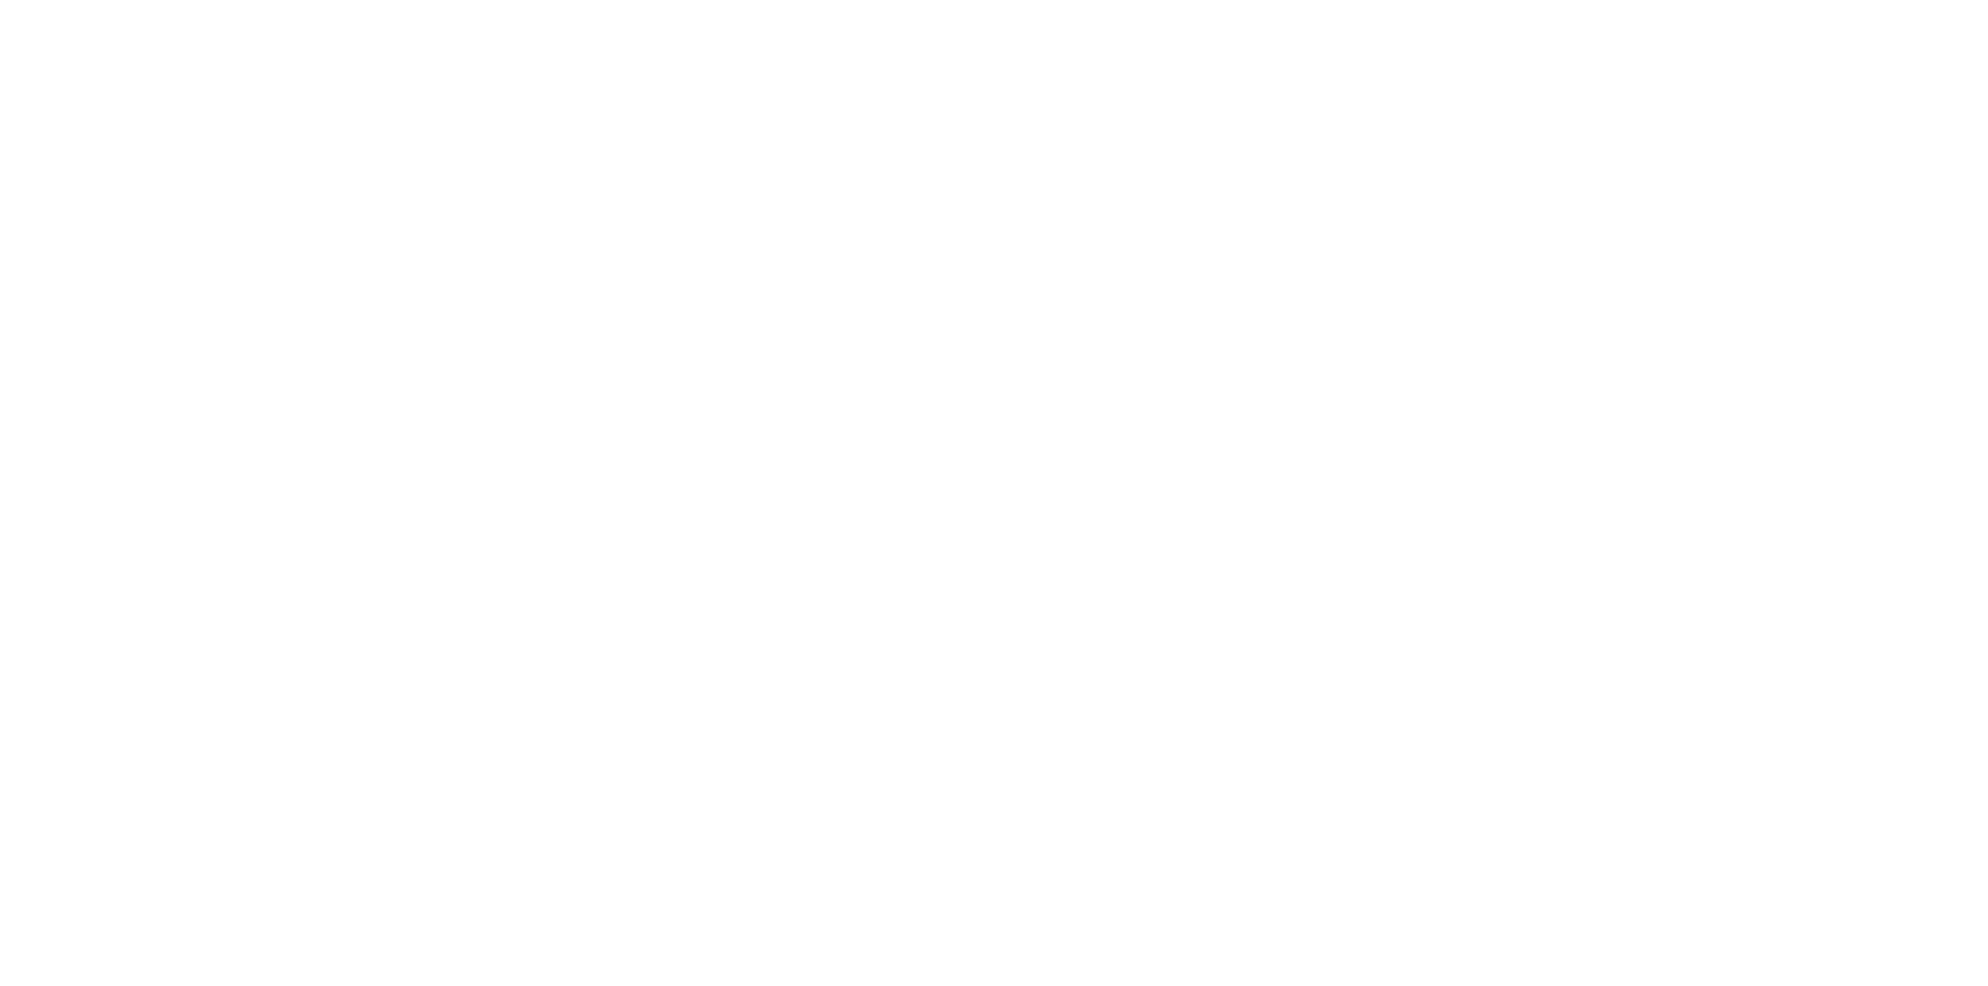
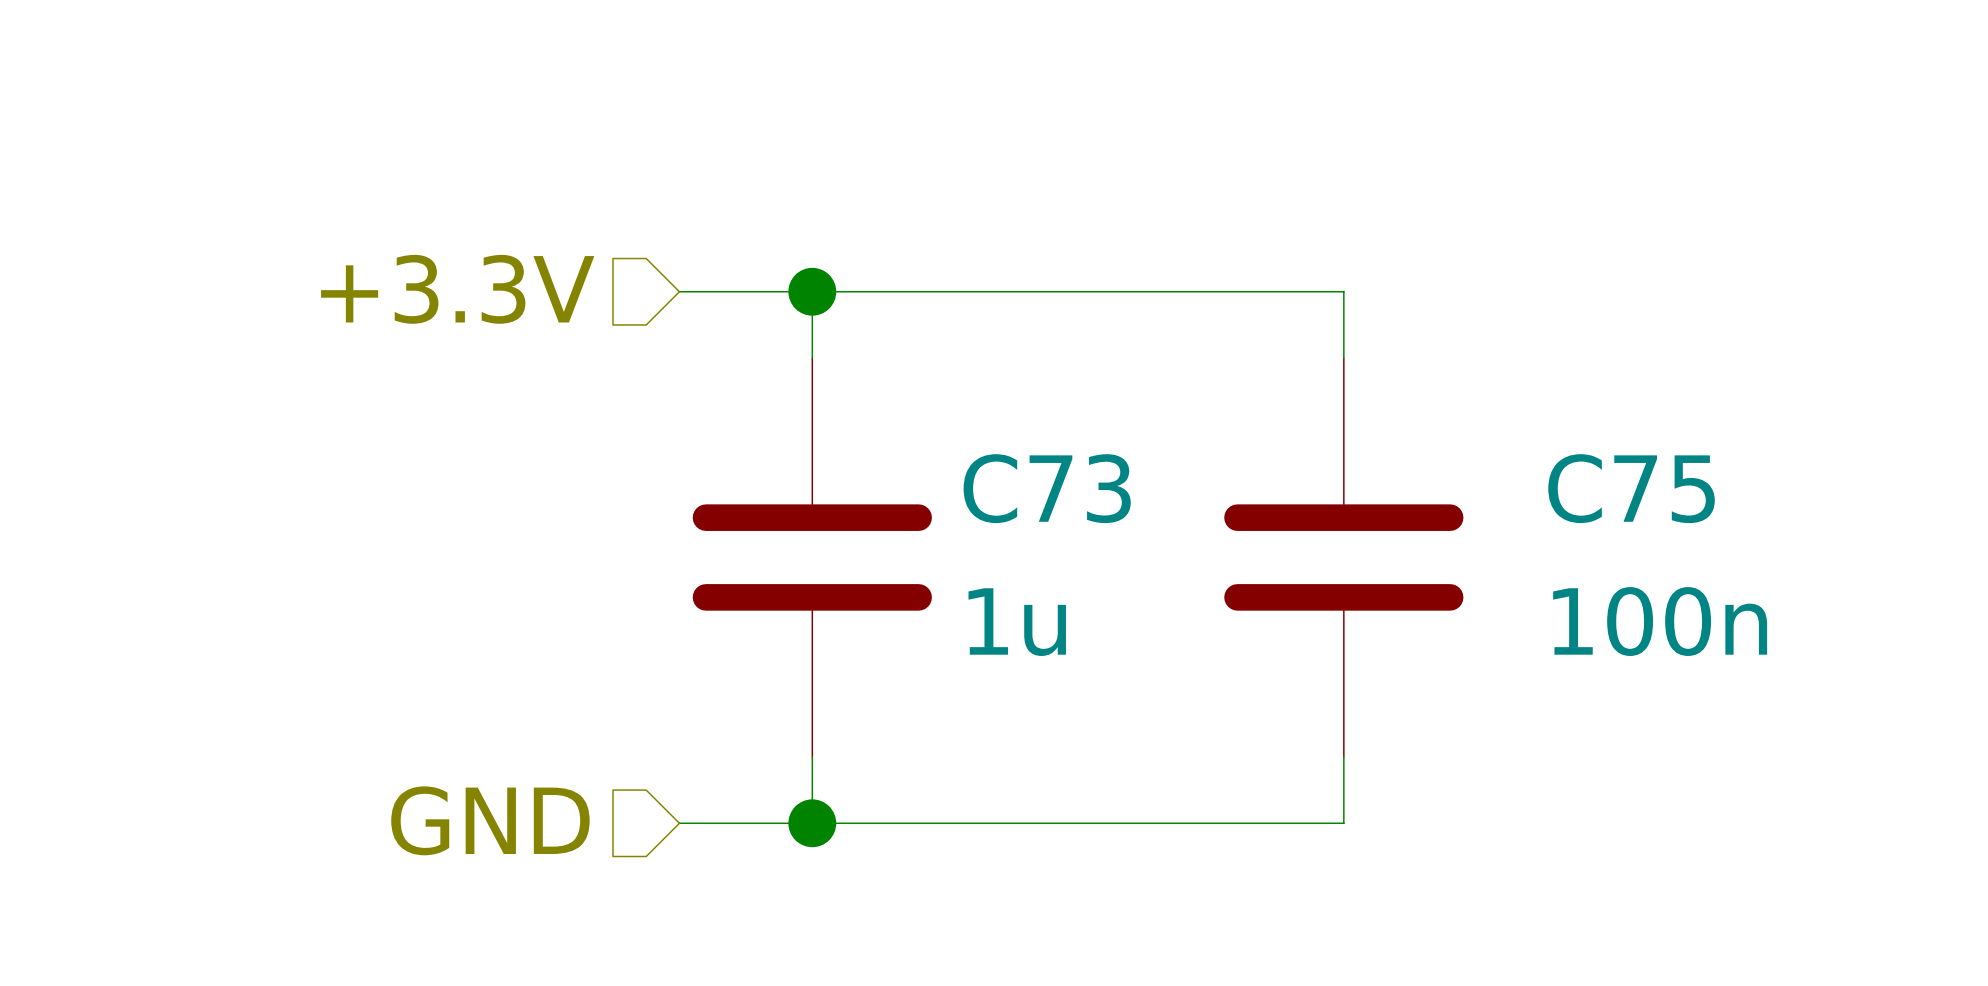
hierarchical label: none -> +3.3V (457, 289)
wire: none -> (679, 291) (1343, 291) (1343, 358)
wire: none -> (812, 291) (812, 358)
junction: none -> (812, 291)
C73: none -> 1u (812, 557)
C75: none -> 100n (1343, 557)
wire: none -> (812, 756) (812, 823)
wire: none -> (1343, 756) (1343, 823) (679, 823)
hierarchical label: none -> GND (490, 820)
junction: none -> (812, 823)

